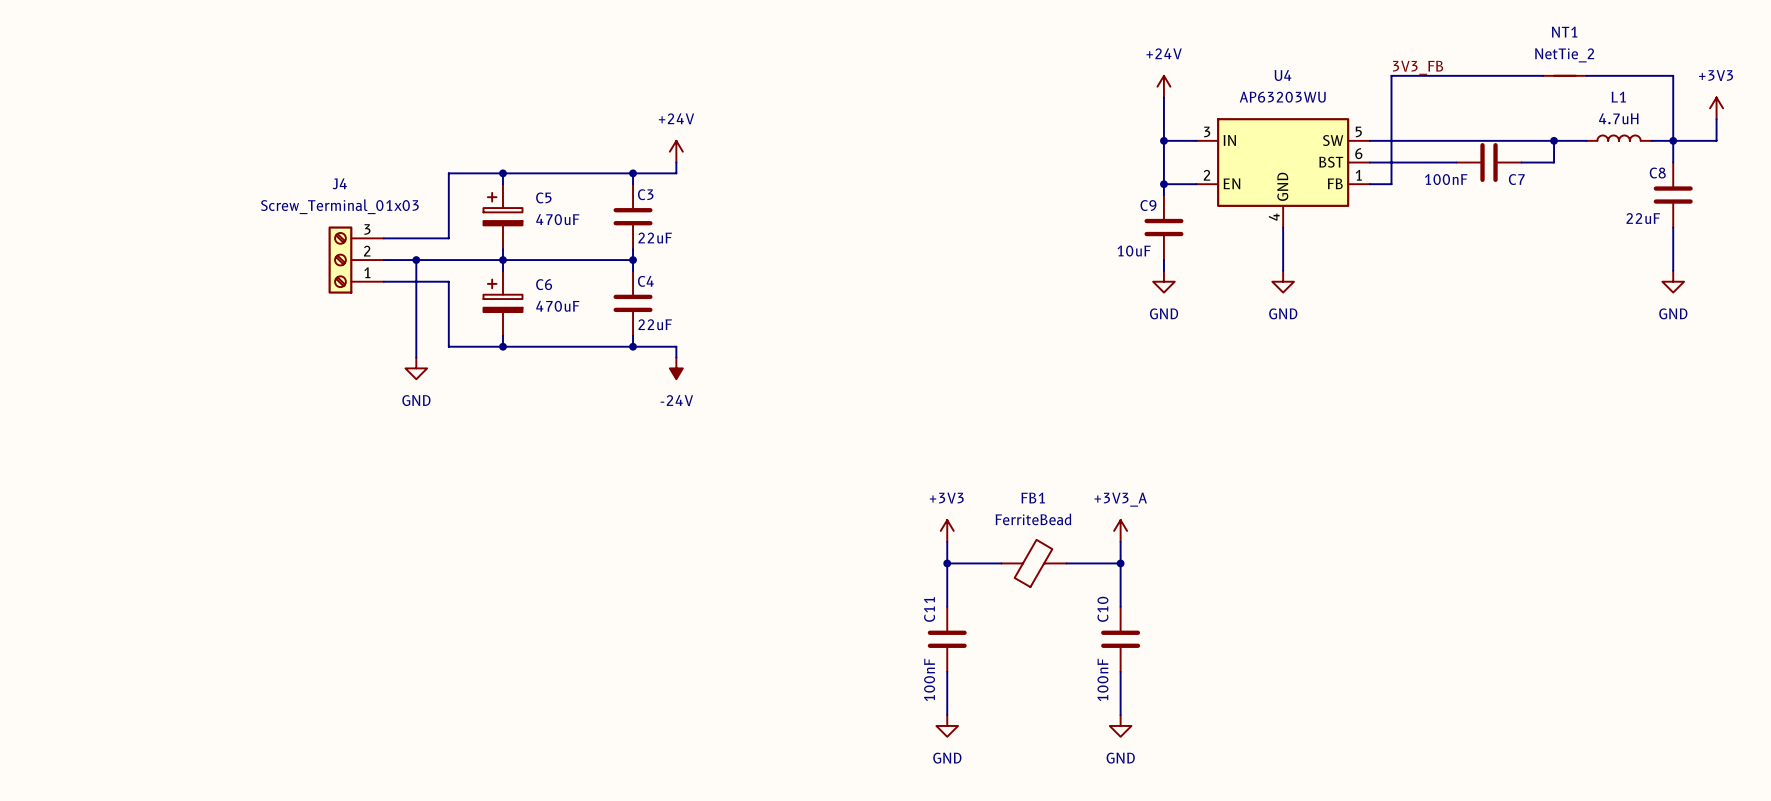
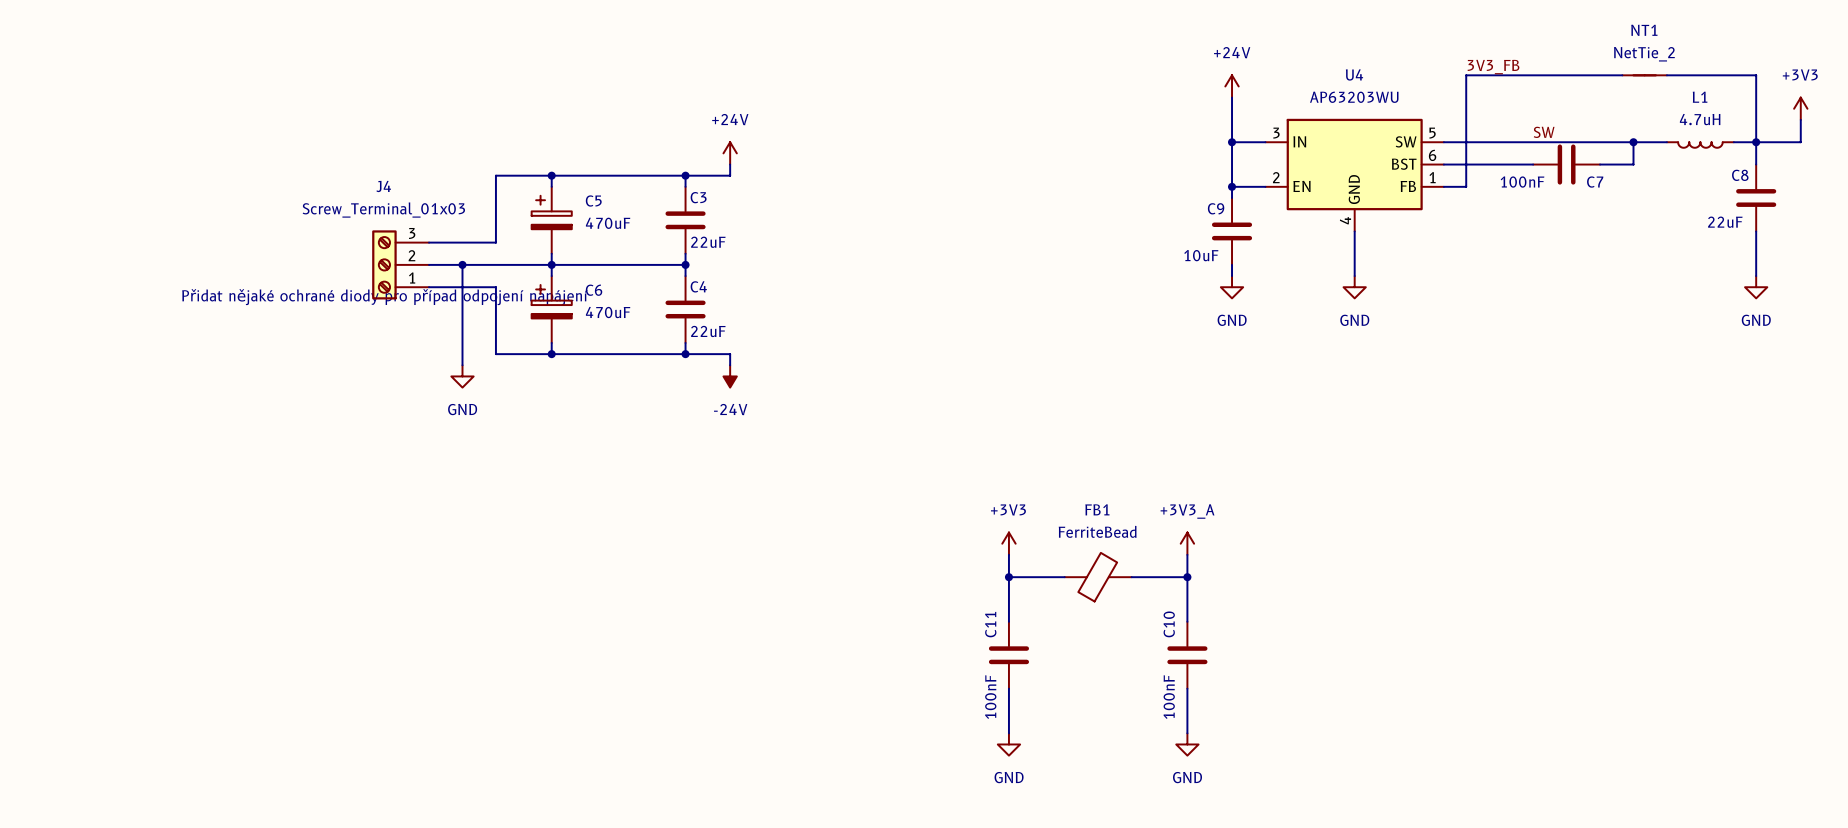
label: none -> SW (1544, 132)
L1 rotation: 0° (1619, 138) -> 180° (1700, 145)
text: none -> Přidat nějaké ochrané diody pro případ odpojení napájení (384, 297)

